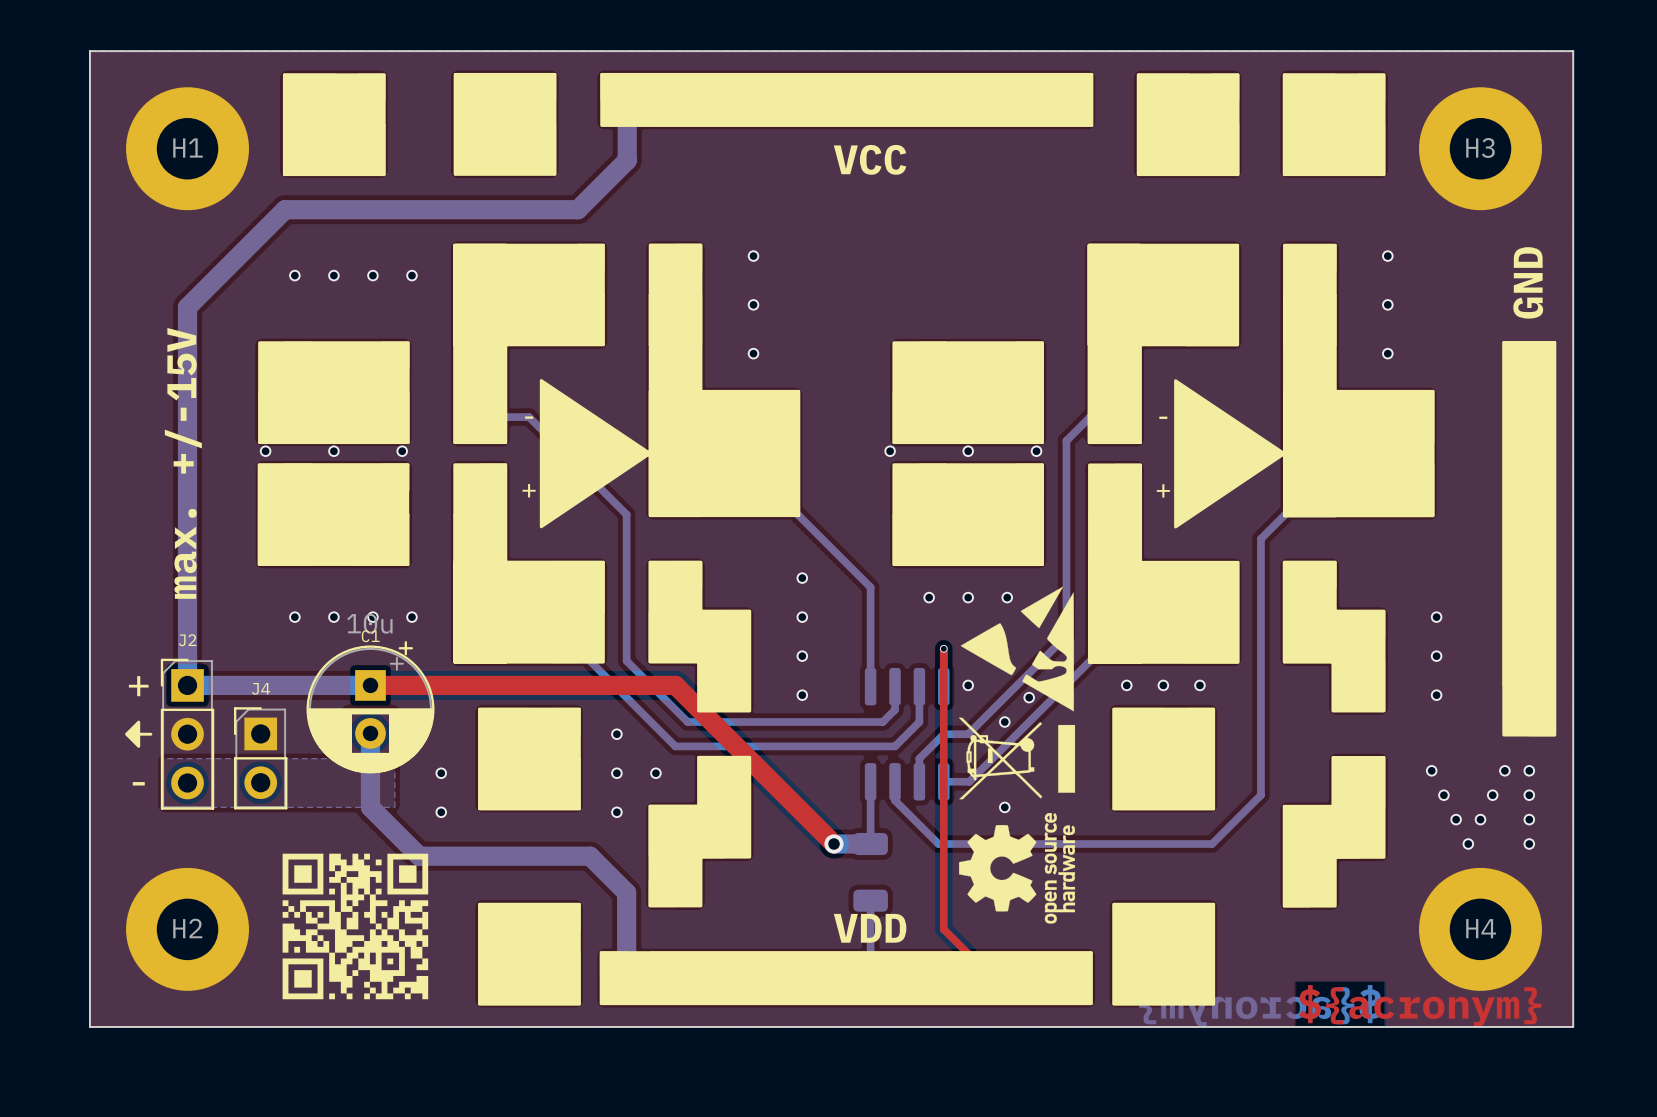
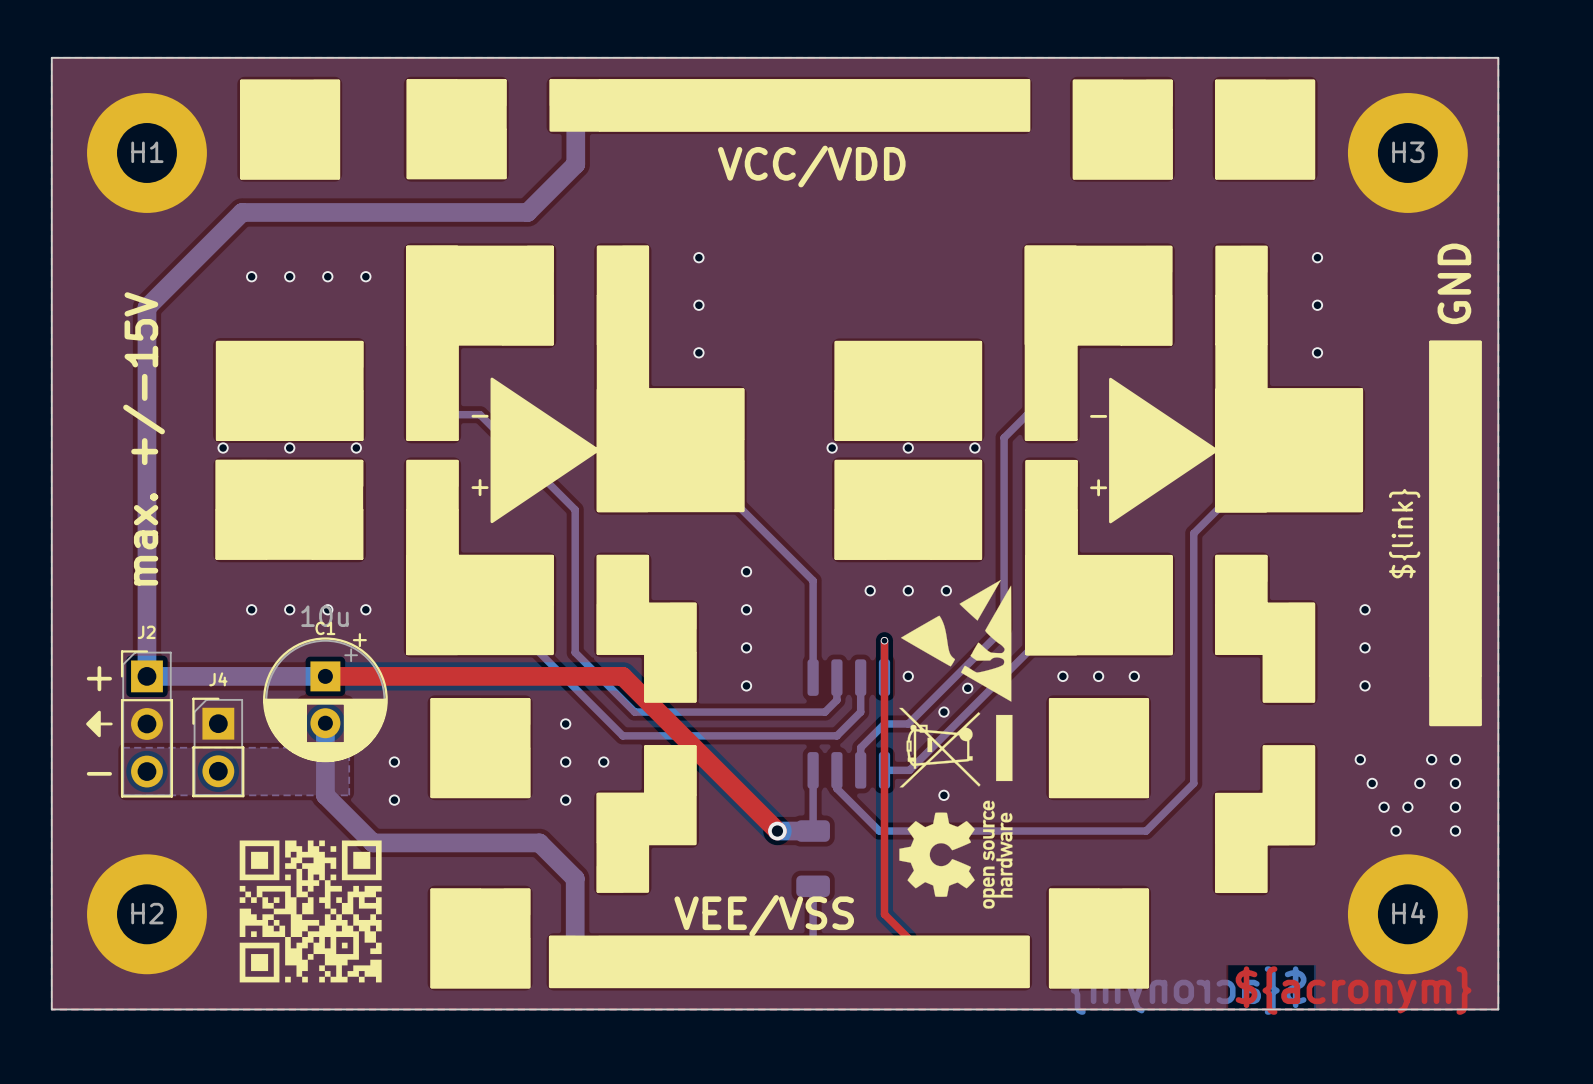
text: VCC (870, 159) -> VCC/VDD (811, 166)
text: none -> ${link} (1404, 533)
text: VDD (870, 928) -> none
text: none -> VEE/VSS (764, 915)

